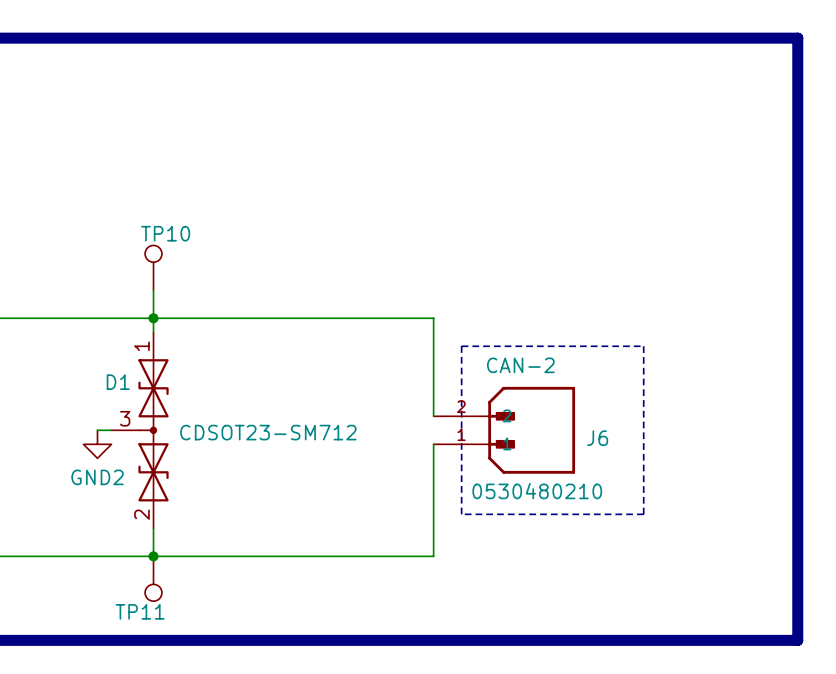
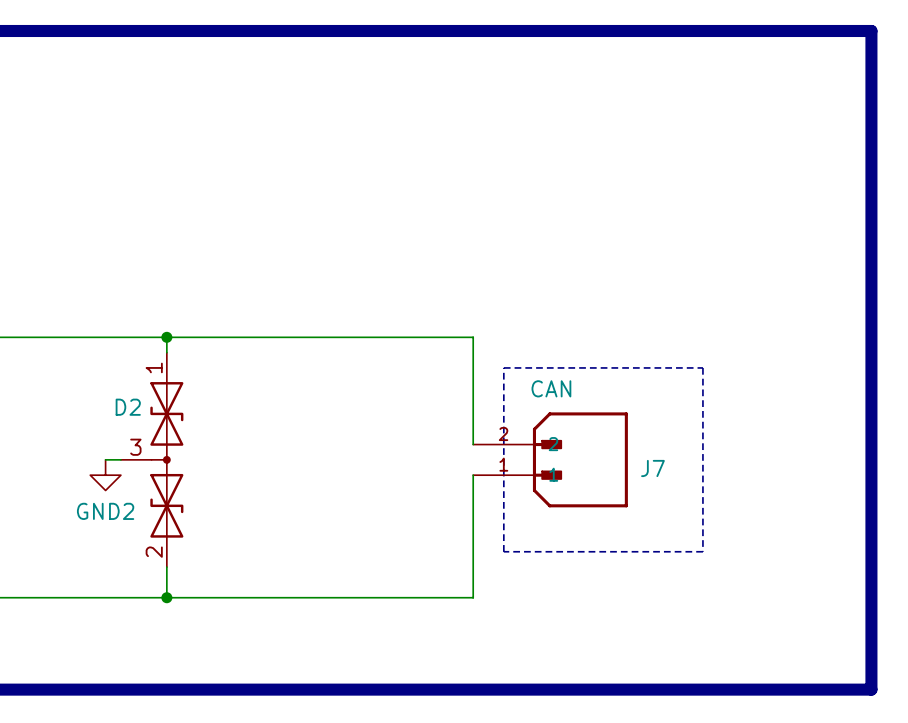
TP10: (153, 267) -> none
wire: (153, 290) (153, 318) -> none
J6 value: CAN-2 (520, 365) -> CAN (551, 388)
D1 name: D1 (118, 382) -> D2 (128, 407)
D1 text: CDSOT23-SM712 (268, 432) -> none
J6 name: J6 (597, 438) -> J7 (652, 468)
J6 text: 0530480210 (537, 491) -> none
TP11: (153, 578) -> none

